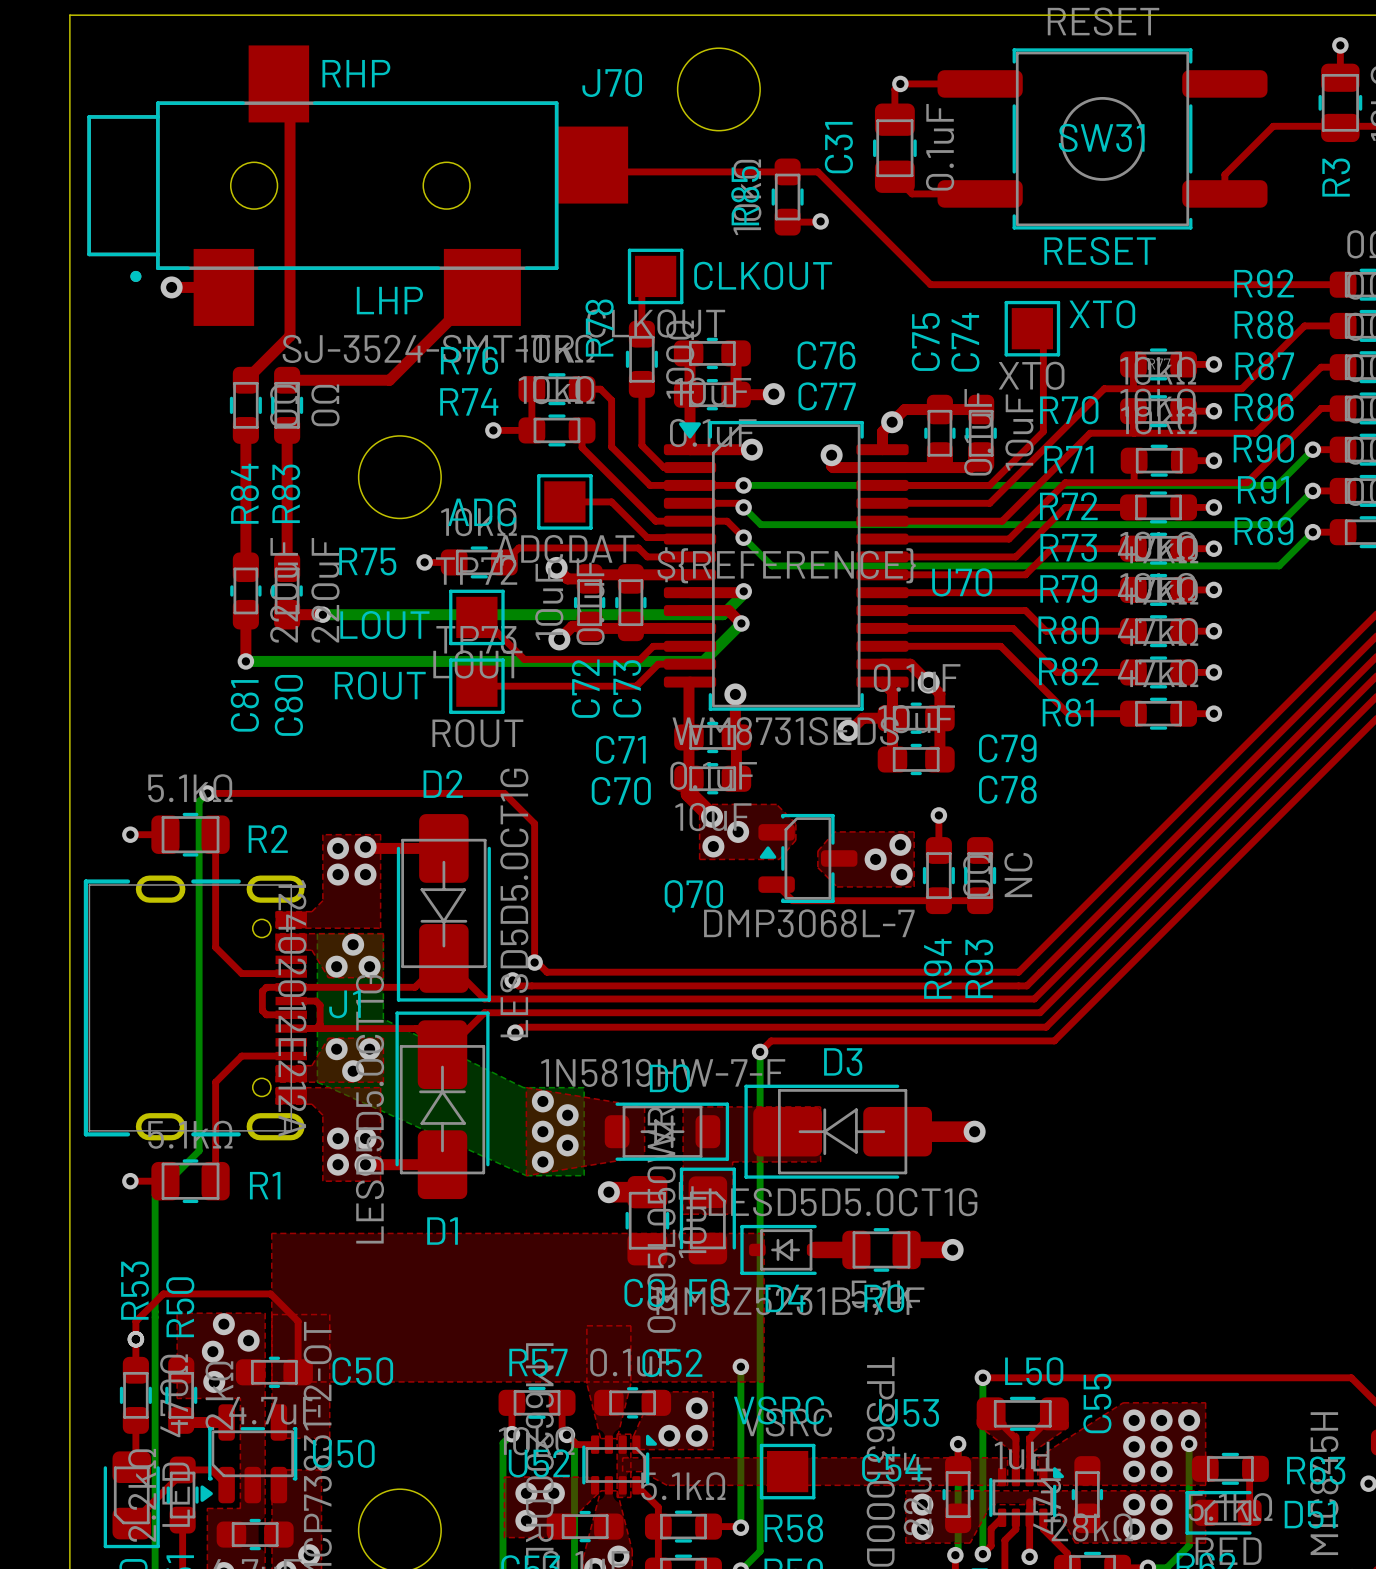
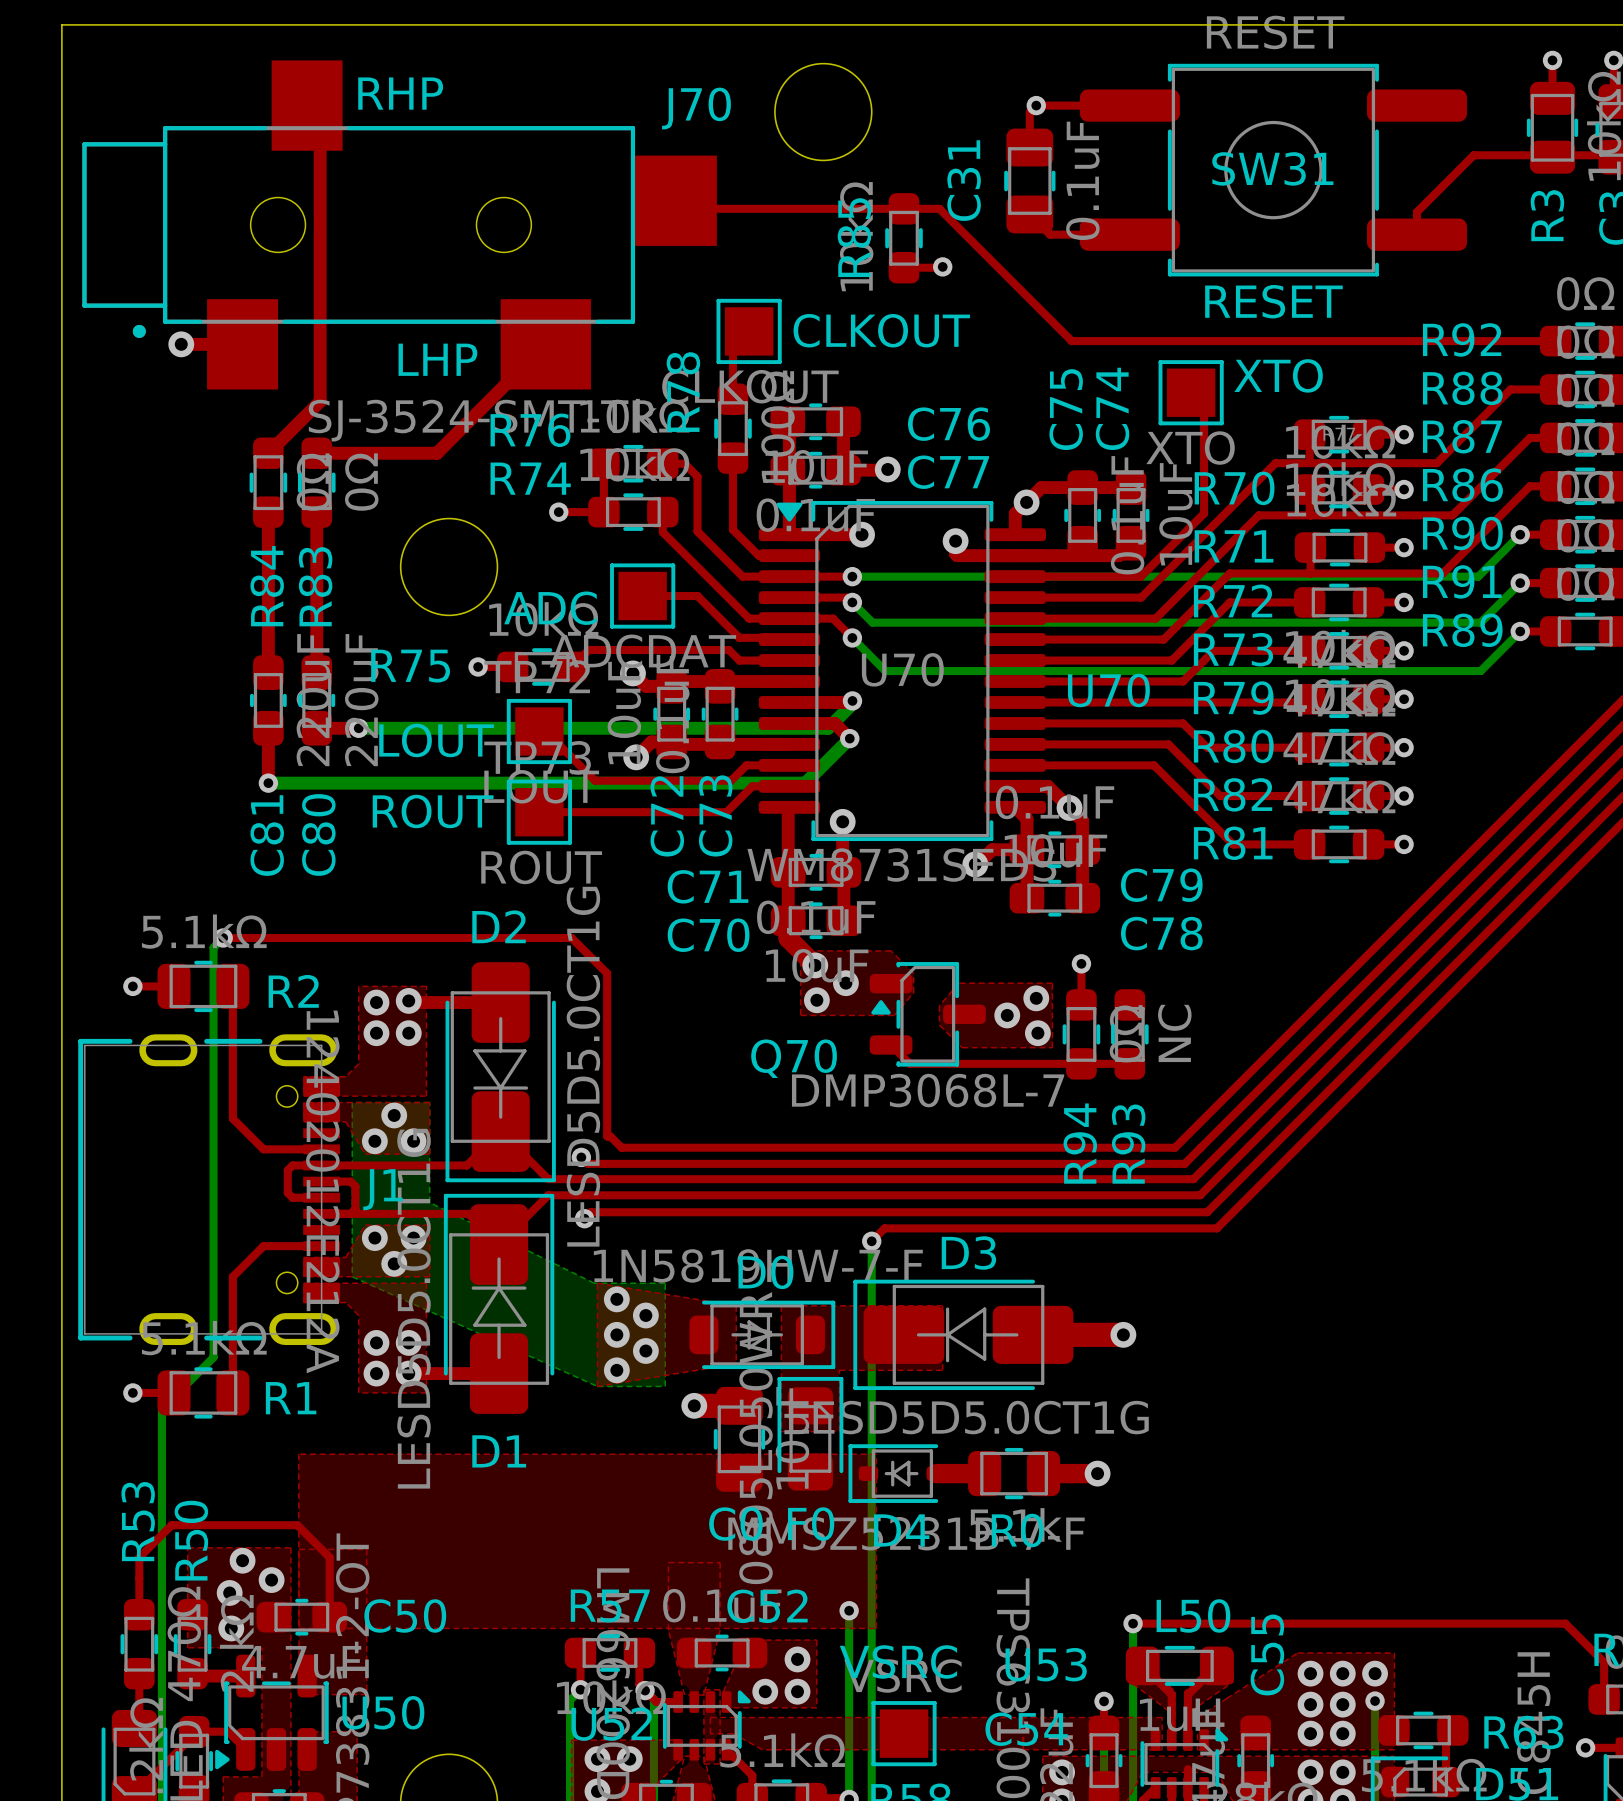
text: ${REFERENCE} (786, 565) -> U70 (902, 669)
via: (534, 962) -> none
via: (135, 1339) -> none

